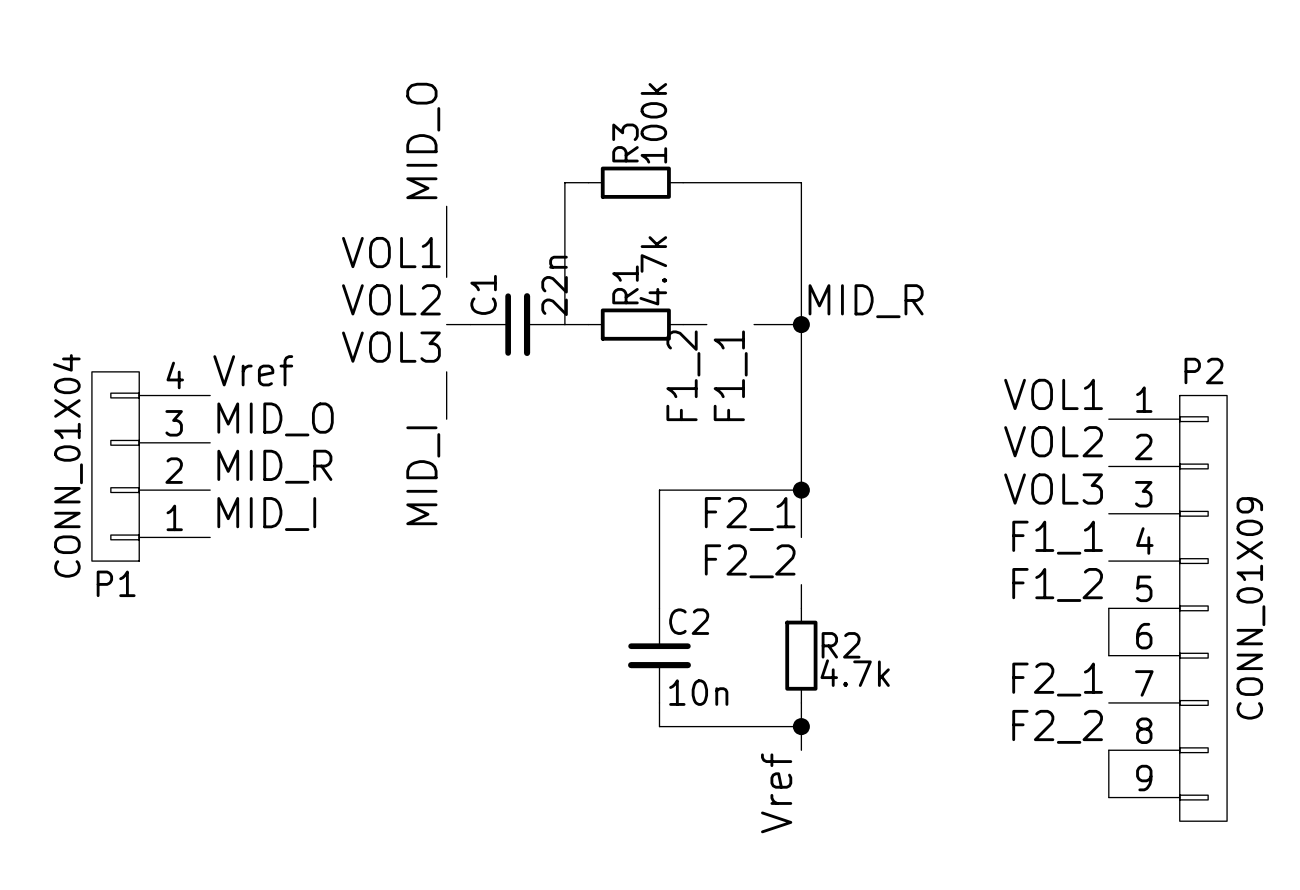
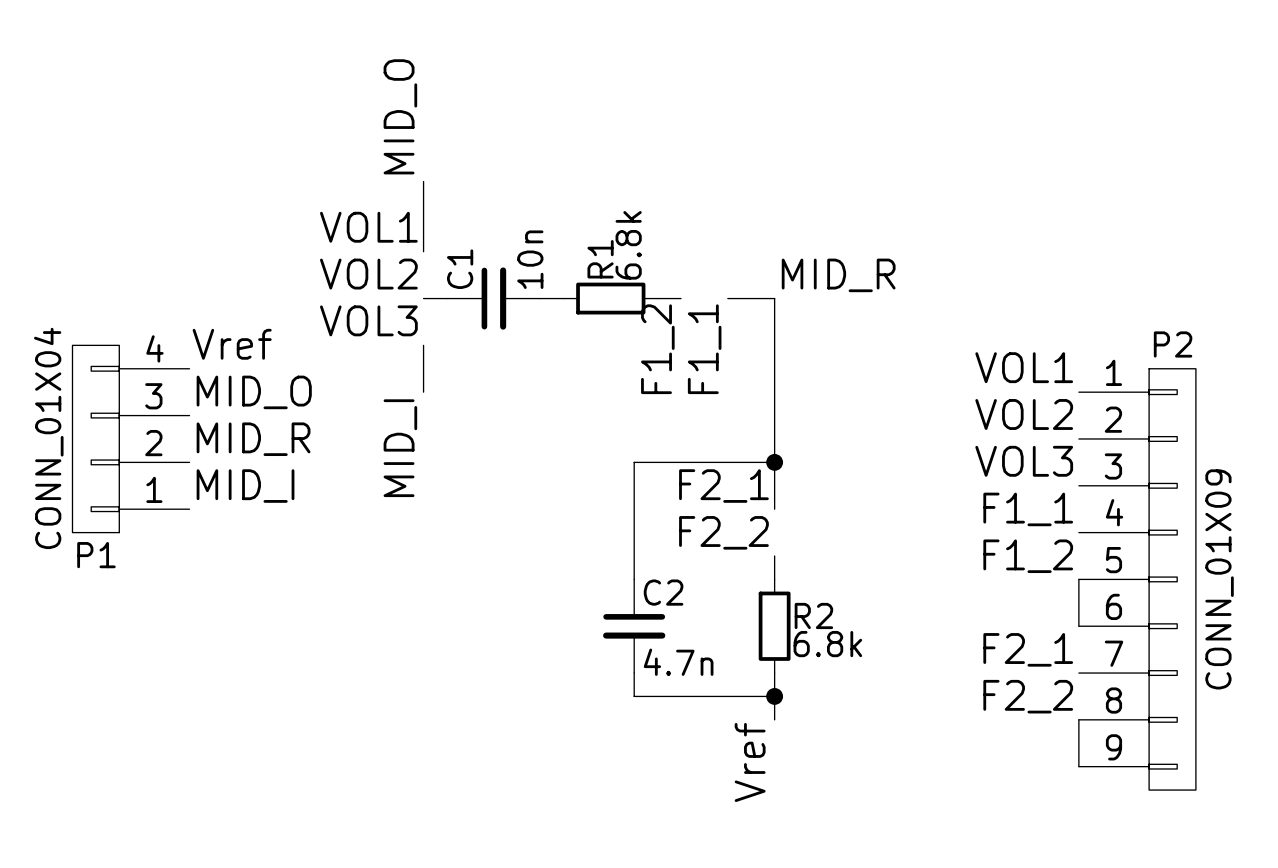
wire: (588, 182) (564, 182) (564, 324) -> none
R3: 100k (635, 182) -> none
wire: (683, 182) (801, 182) (801, 324) -> none
R1 value: 4.7k (653, 270) -> 6.8k (628, 245)
C1 value: 22n (554, 285) -> 10n (530, 259)
junction: (801, 324) -> none
R2 value: 4.7k (855, 673) -> 6.8k (827, 644)
C2 value: 10n (698, 692) -> 4.7n (678, 662)

